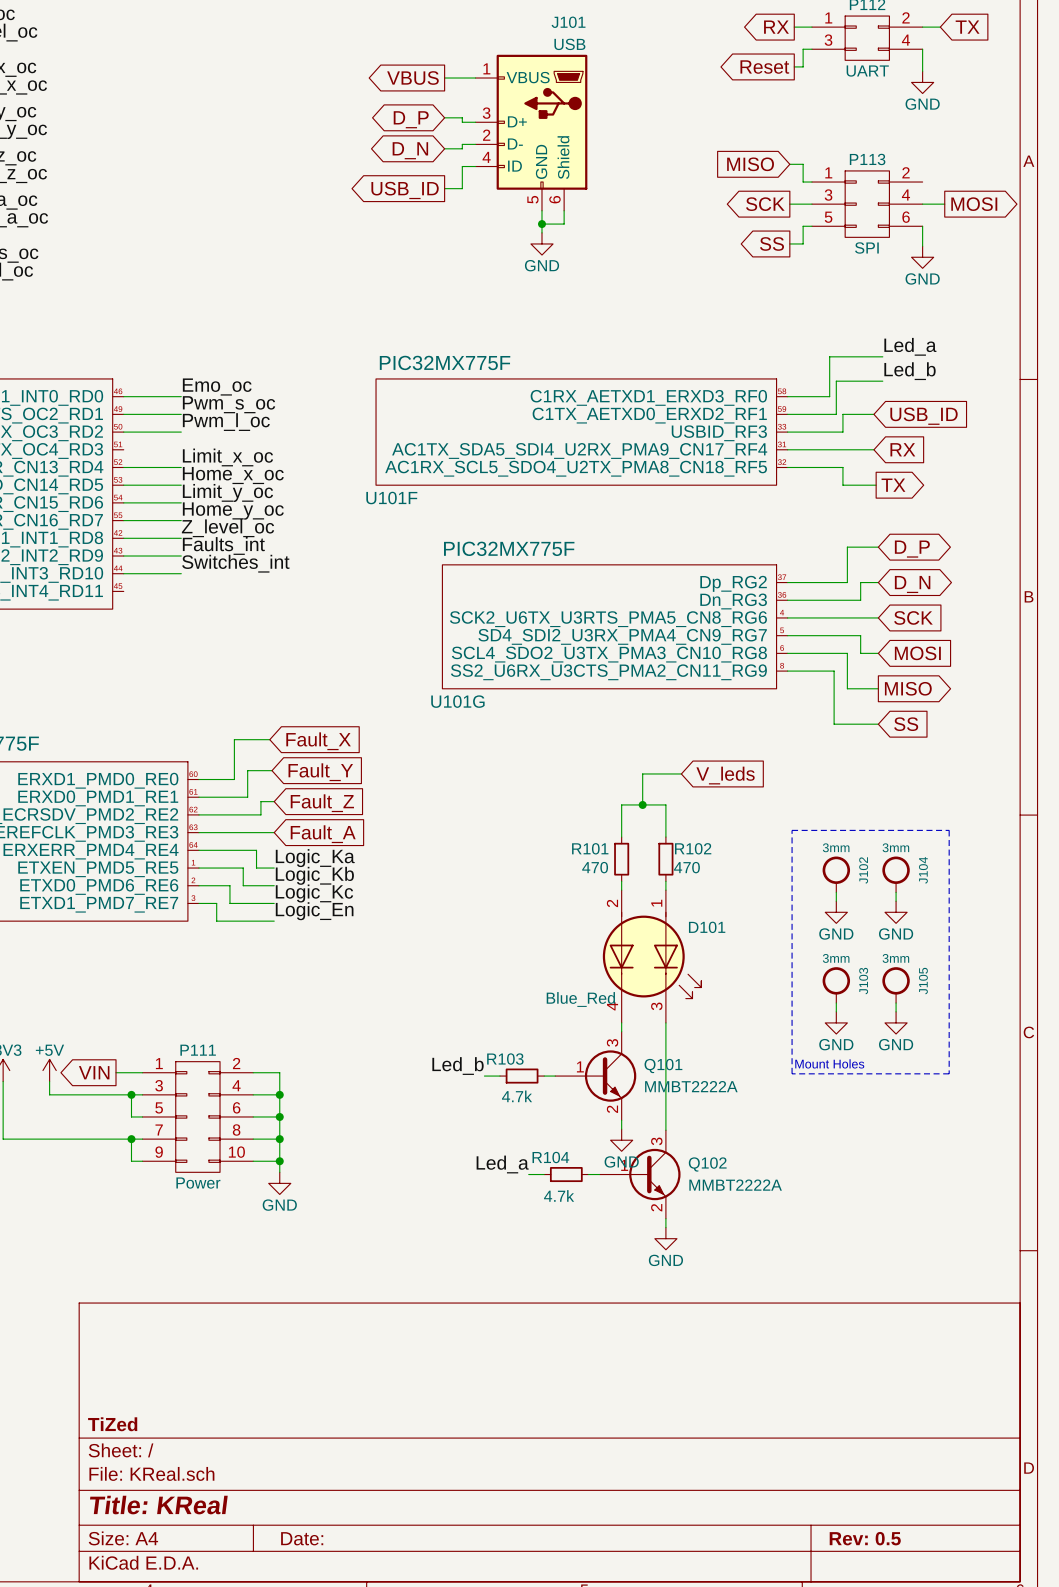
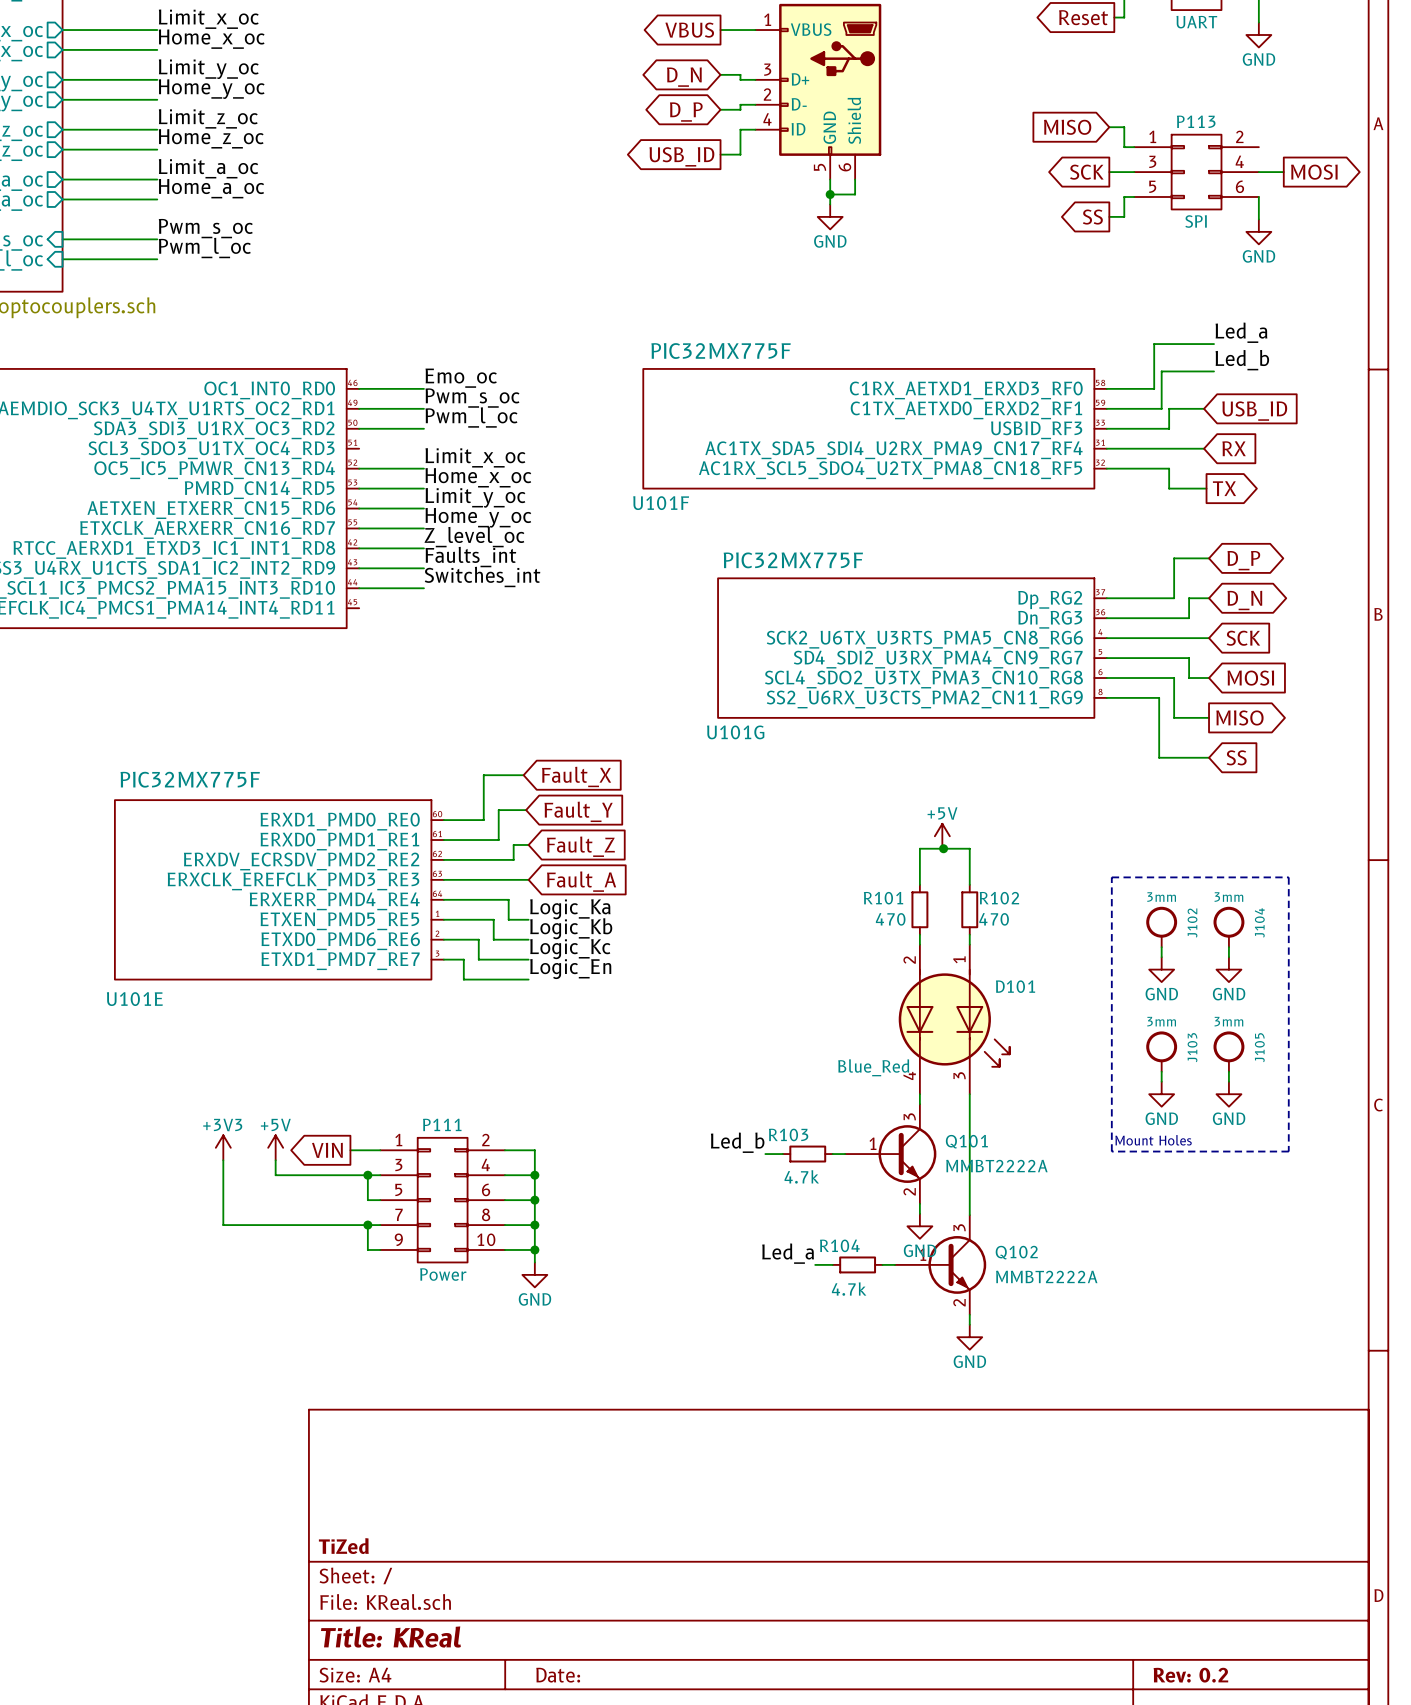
global label: D_P (411, 119) -> D_N (684, 77)
global label: D_N (410, 150) -> D_P (686, 112)
wire: (681, 773) (642, 773) (642, 804) -> none
global label: V_leds (725, 775) -> none
power symbol: none -> +5V (942, 836)
title block: Rev: 0.5 (865, 1538) -> Rev: 0.2 (1190, 1675)

